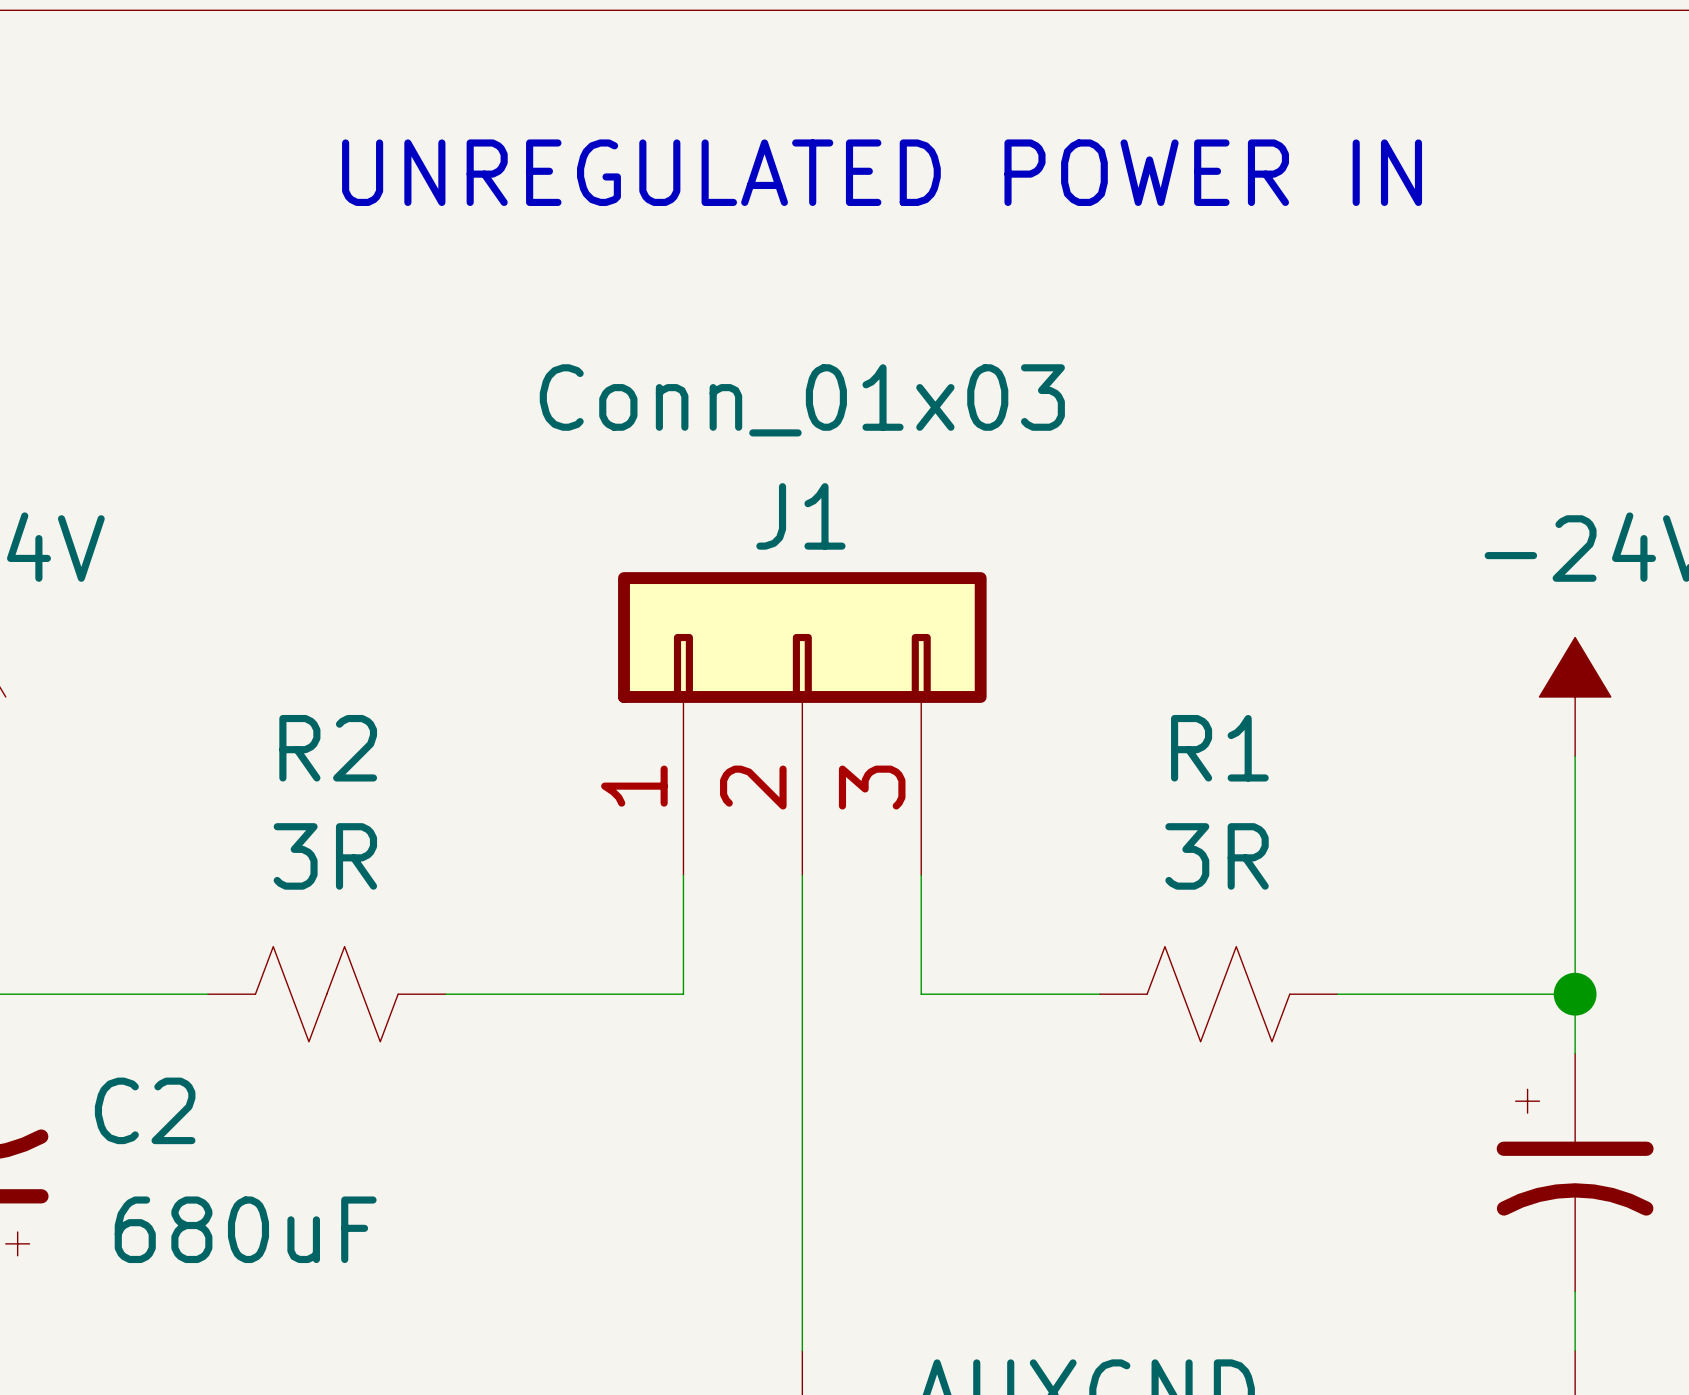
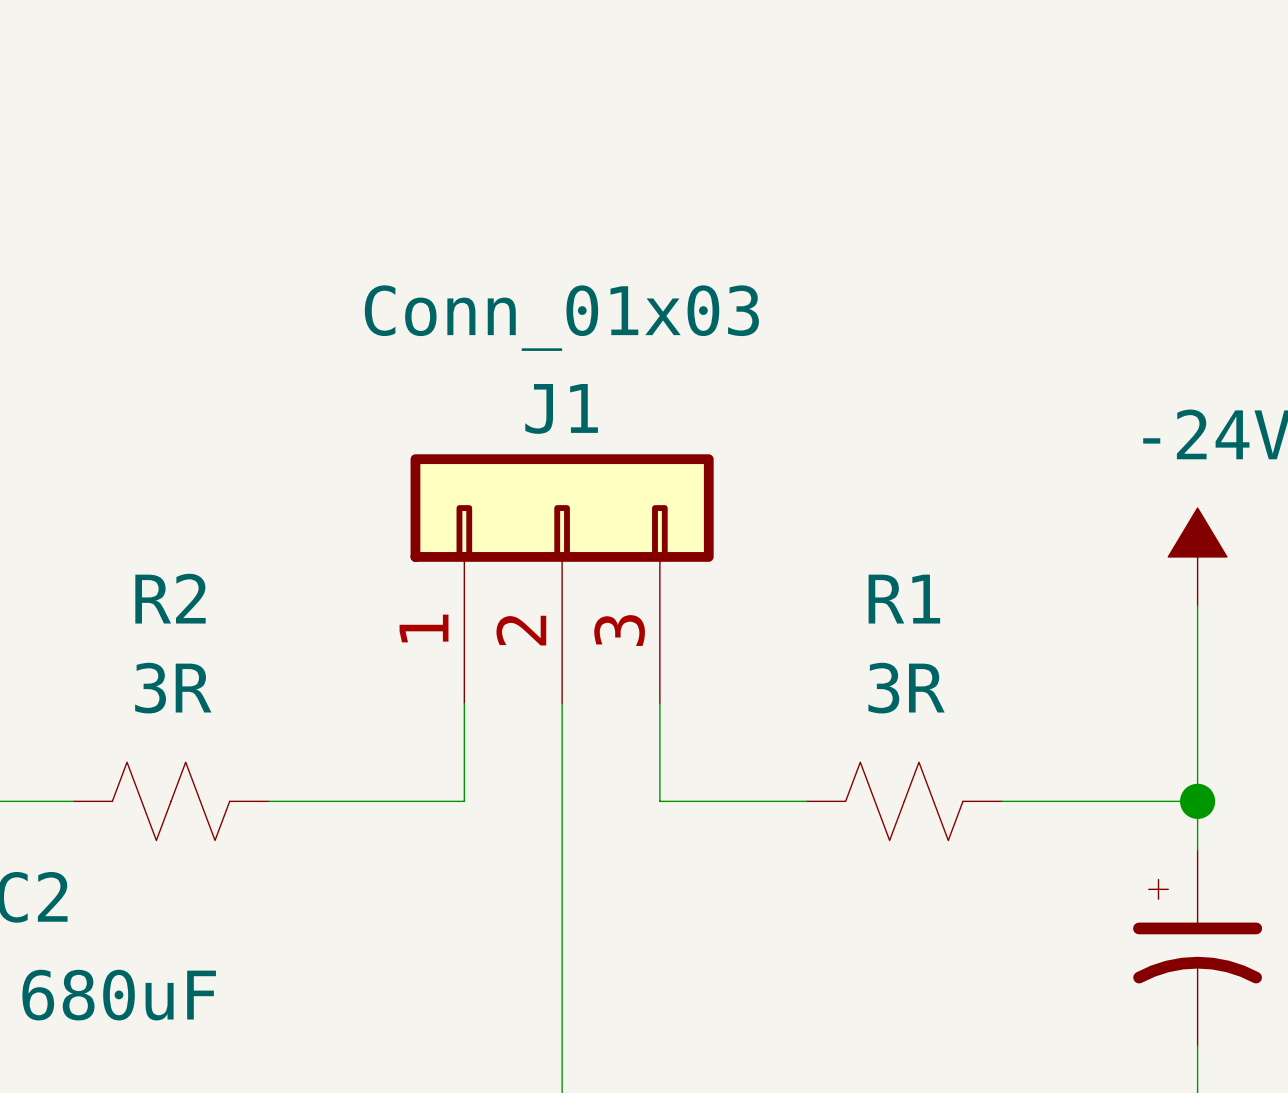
text: UNREGULATED POWER IN (882, 172) -> none

